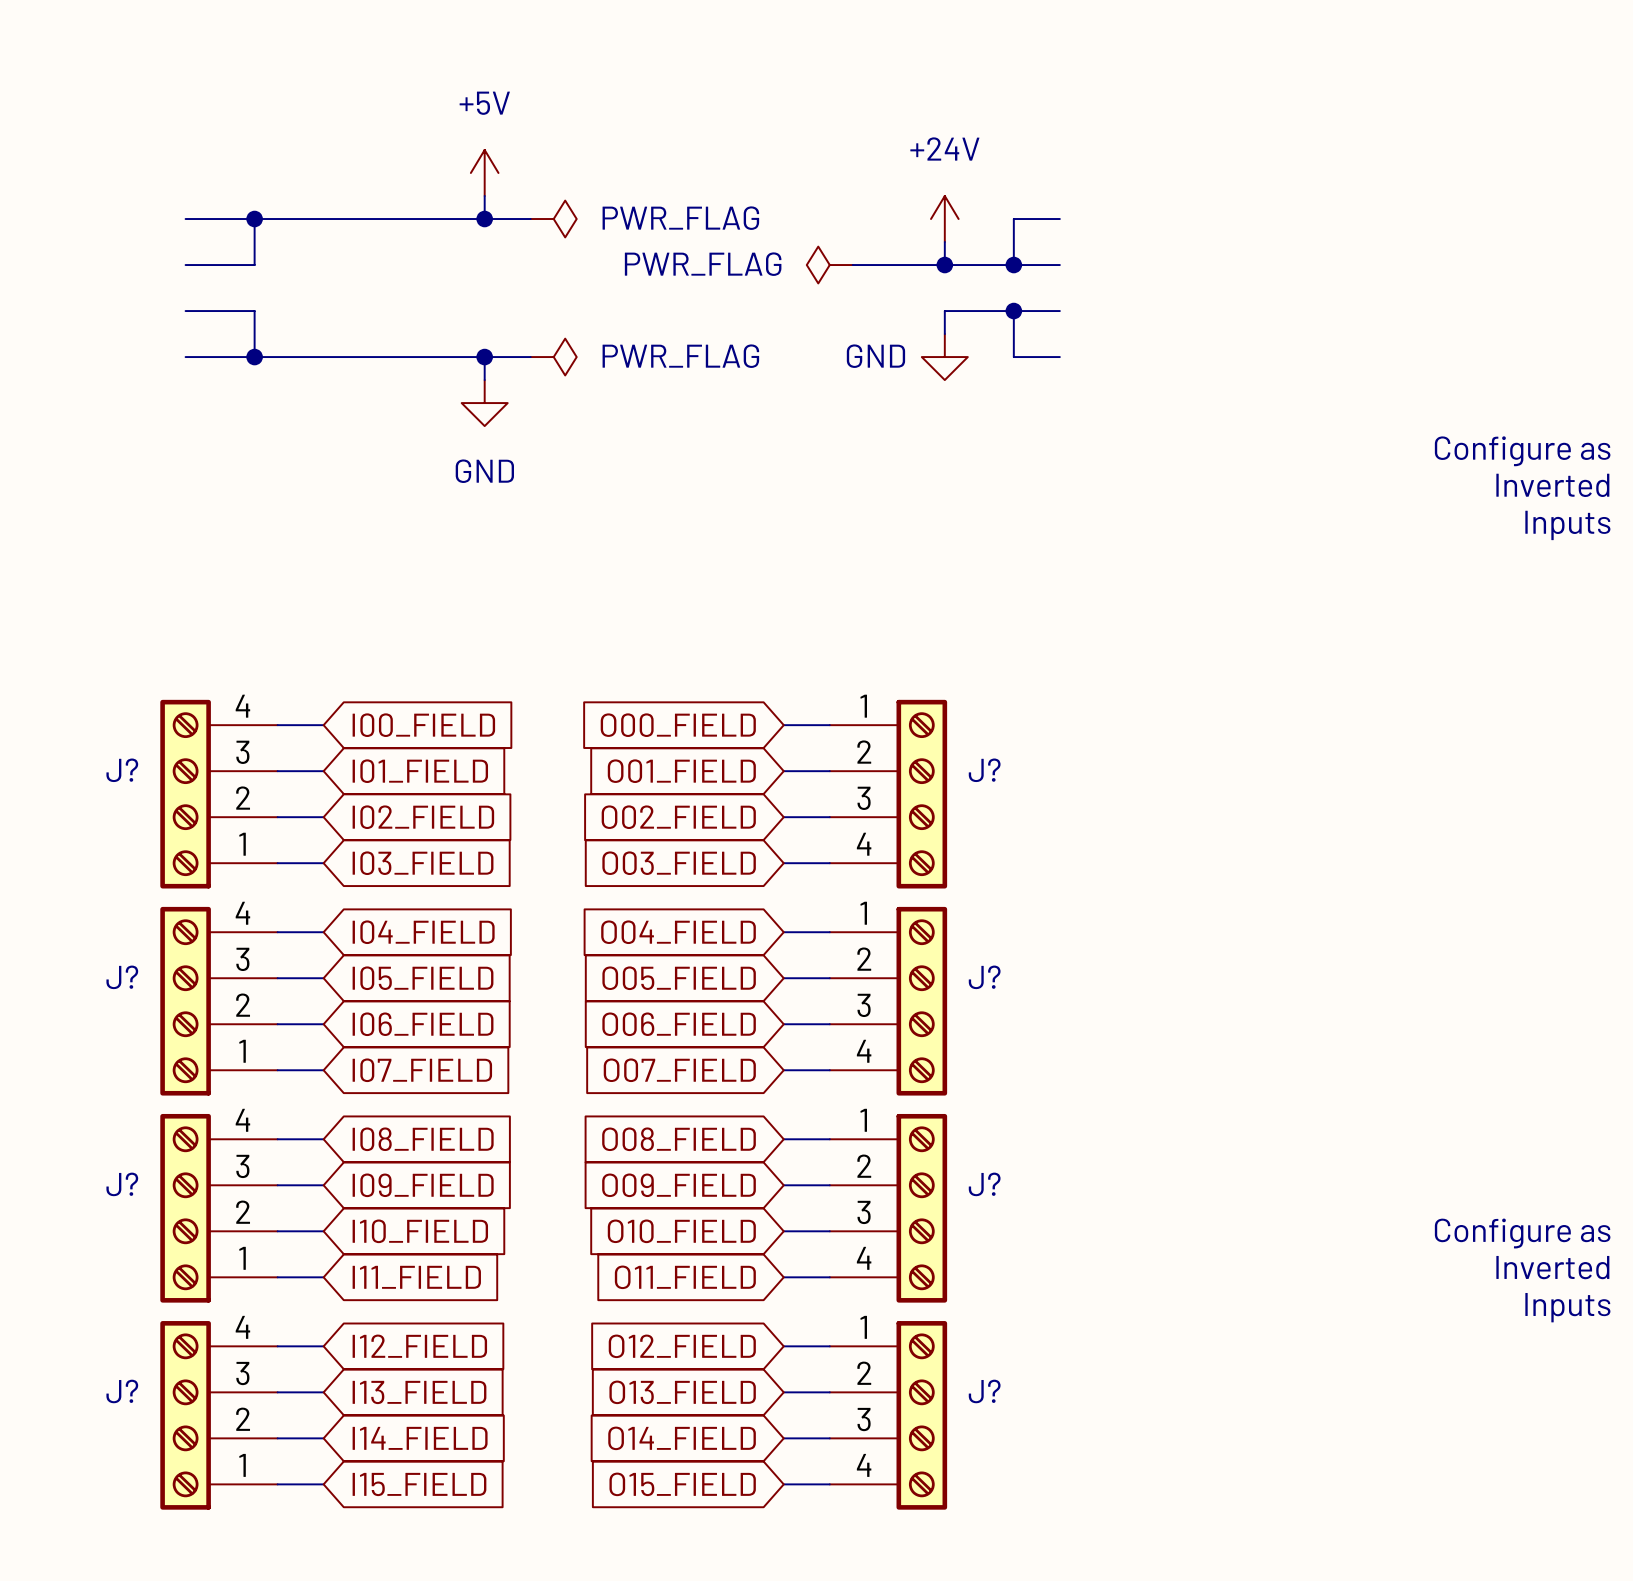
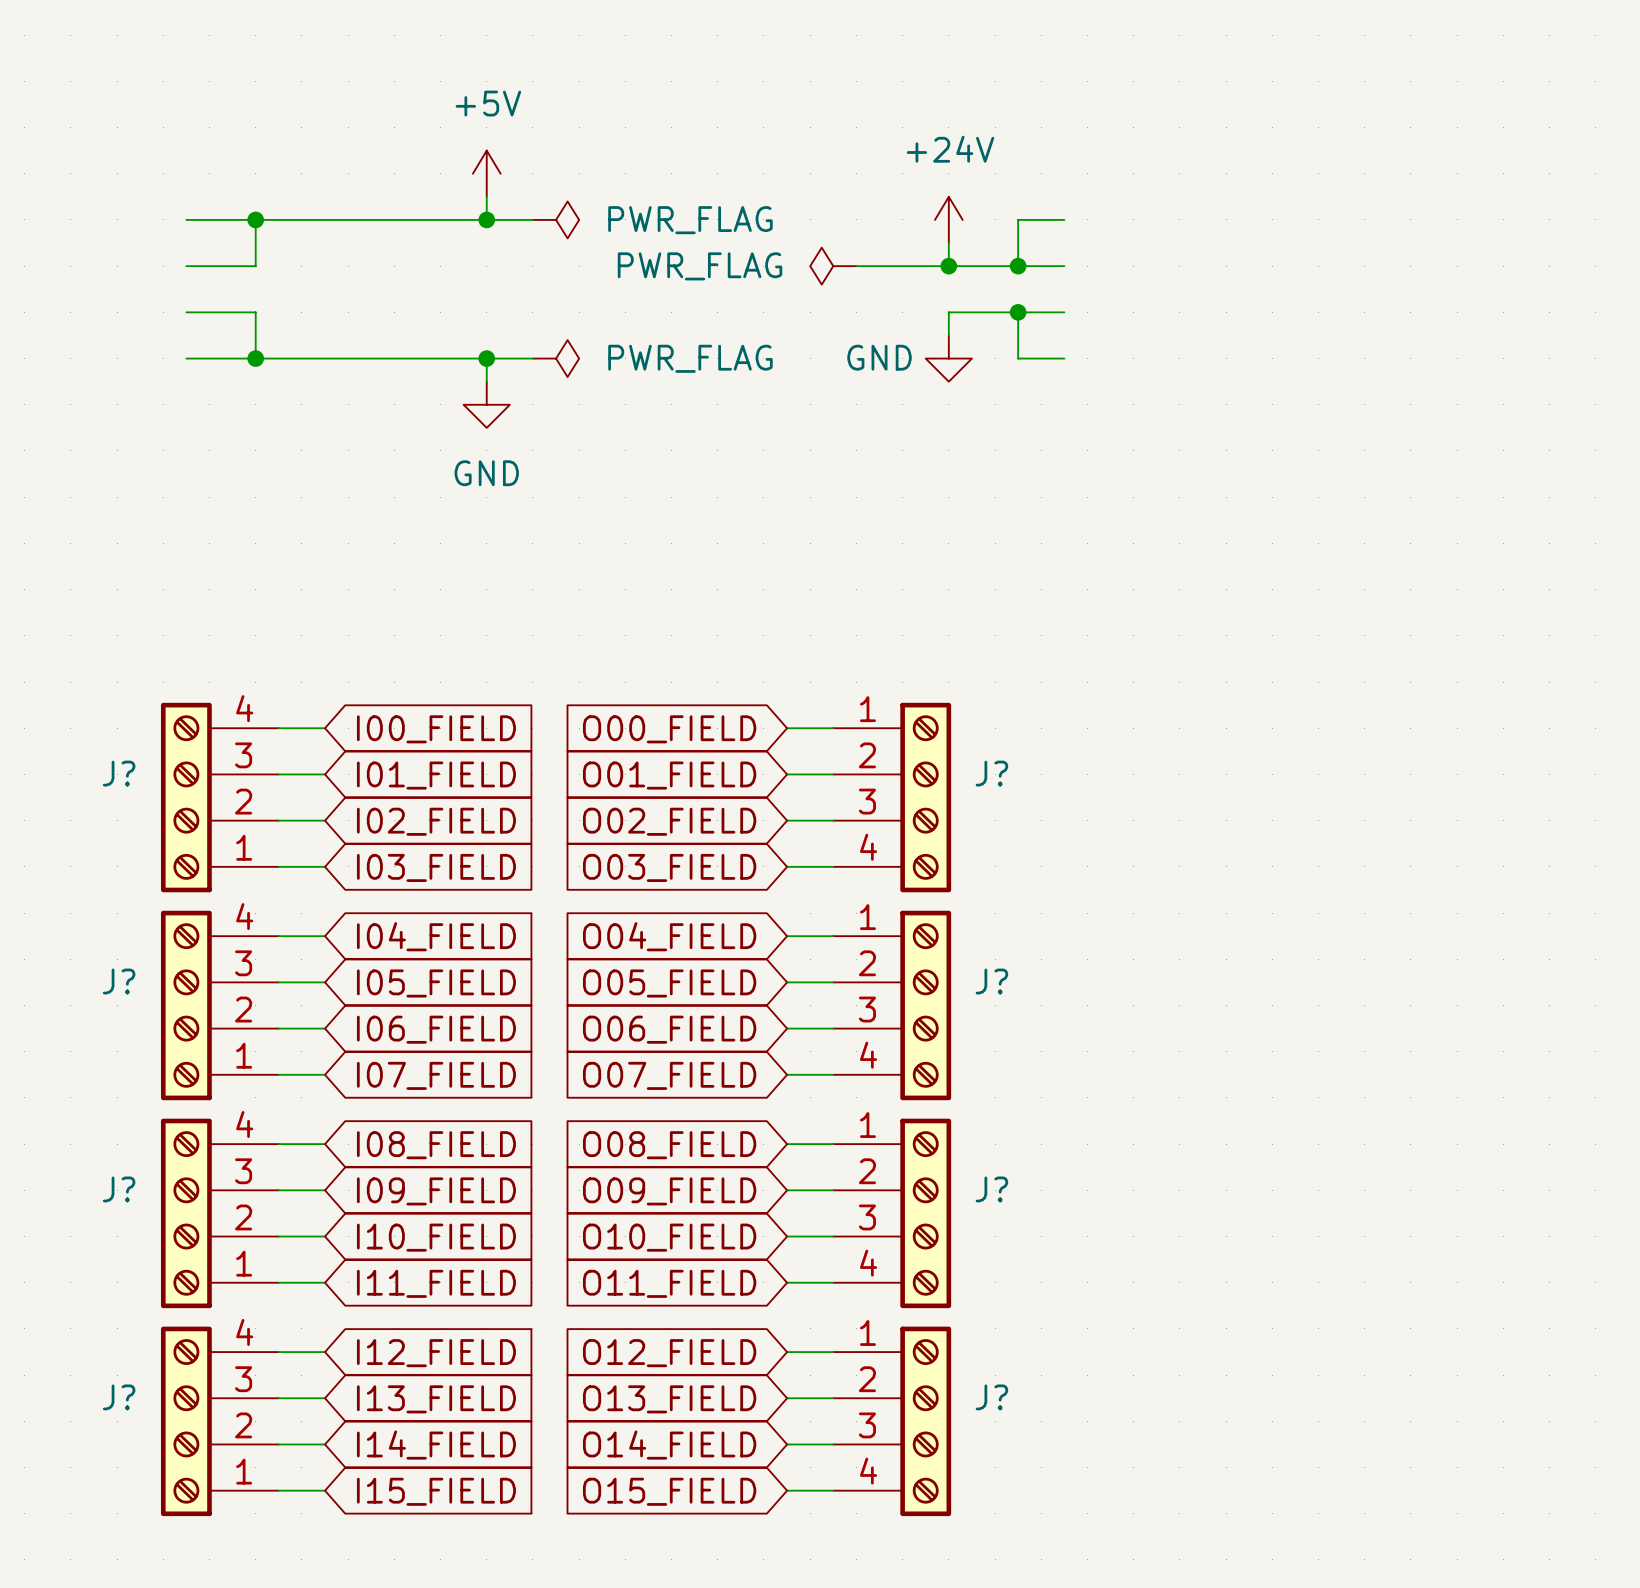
text: Configure as (1522, 451) -> none
text: Inverted (1552, 485) -> none
text: Inputs (1567, 525) -> none
text: Configure as (1522, 1233) -> none
text: Inverted (1552, 1267) -> none
text: Inputs (1567, 1307) -> none

